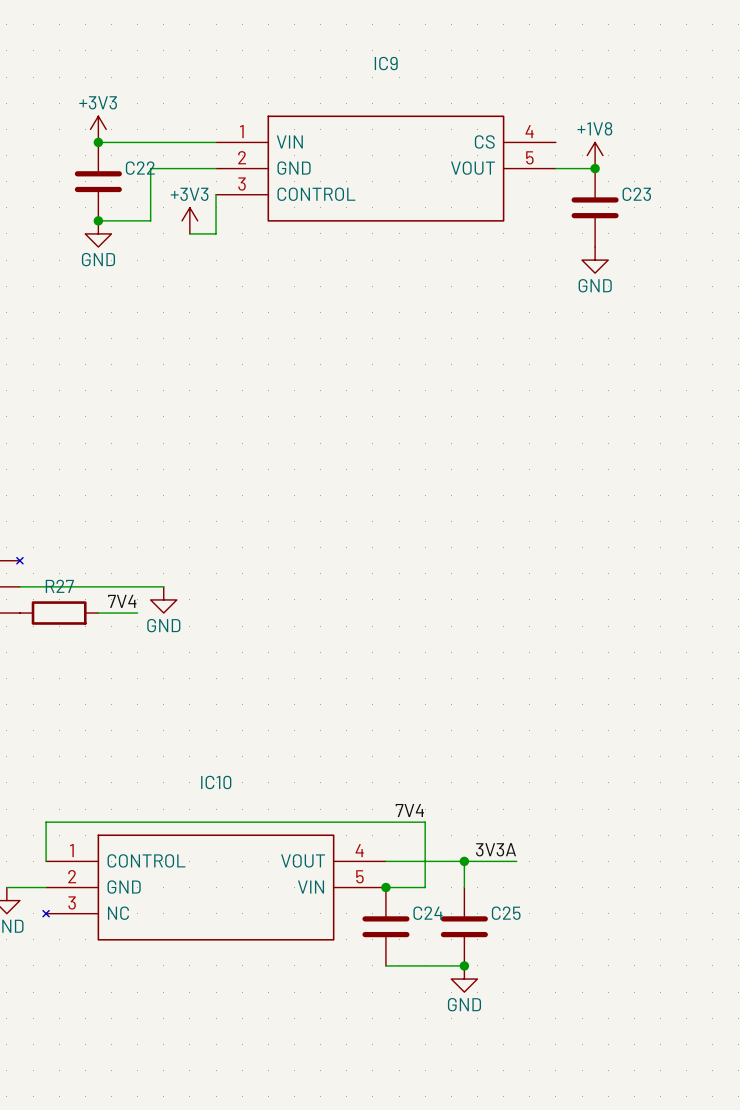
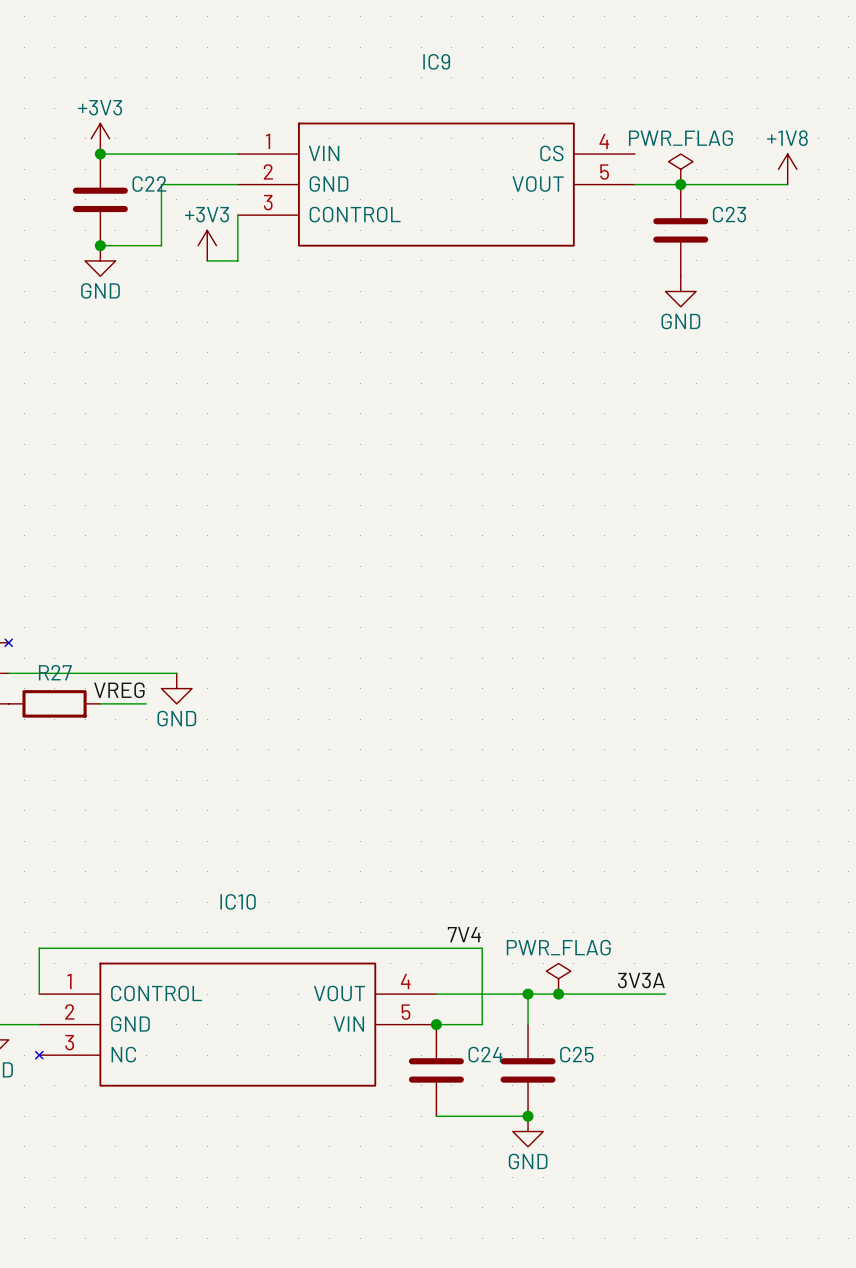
power symbol: +1V8 (595, 155) -> PWR_FLAG (680, 169)
power symbol: none -> +1V8 (787, 169)
wire: none -> (680, 184) (787, 184)
label: 7V4 (122, 601) -> VREG (119, 690)
power symbol: none -> PWR_FLAG (558, 978)
label position: 3V3A (496, 849) -> 3V3A (641, 980)
junction: none -> (558, 994)
wire: none -> (589, 994) (665, 994)

